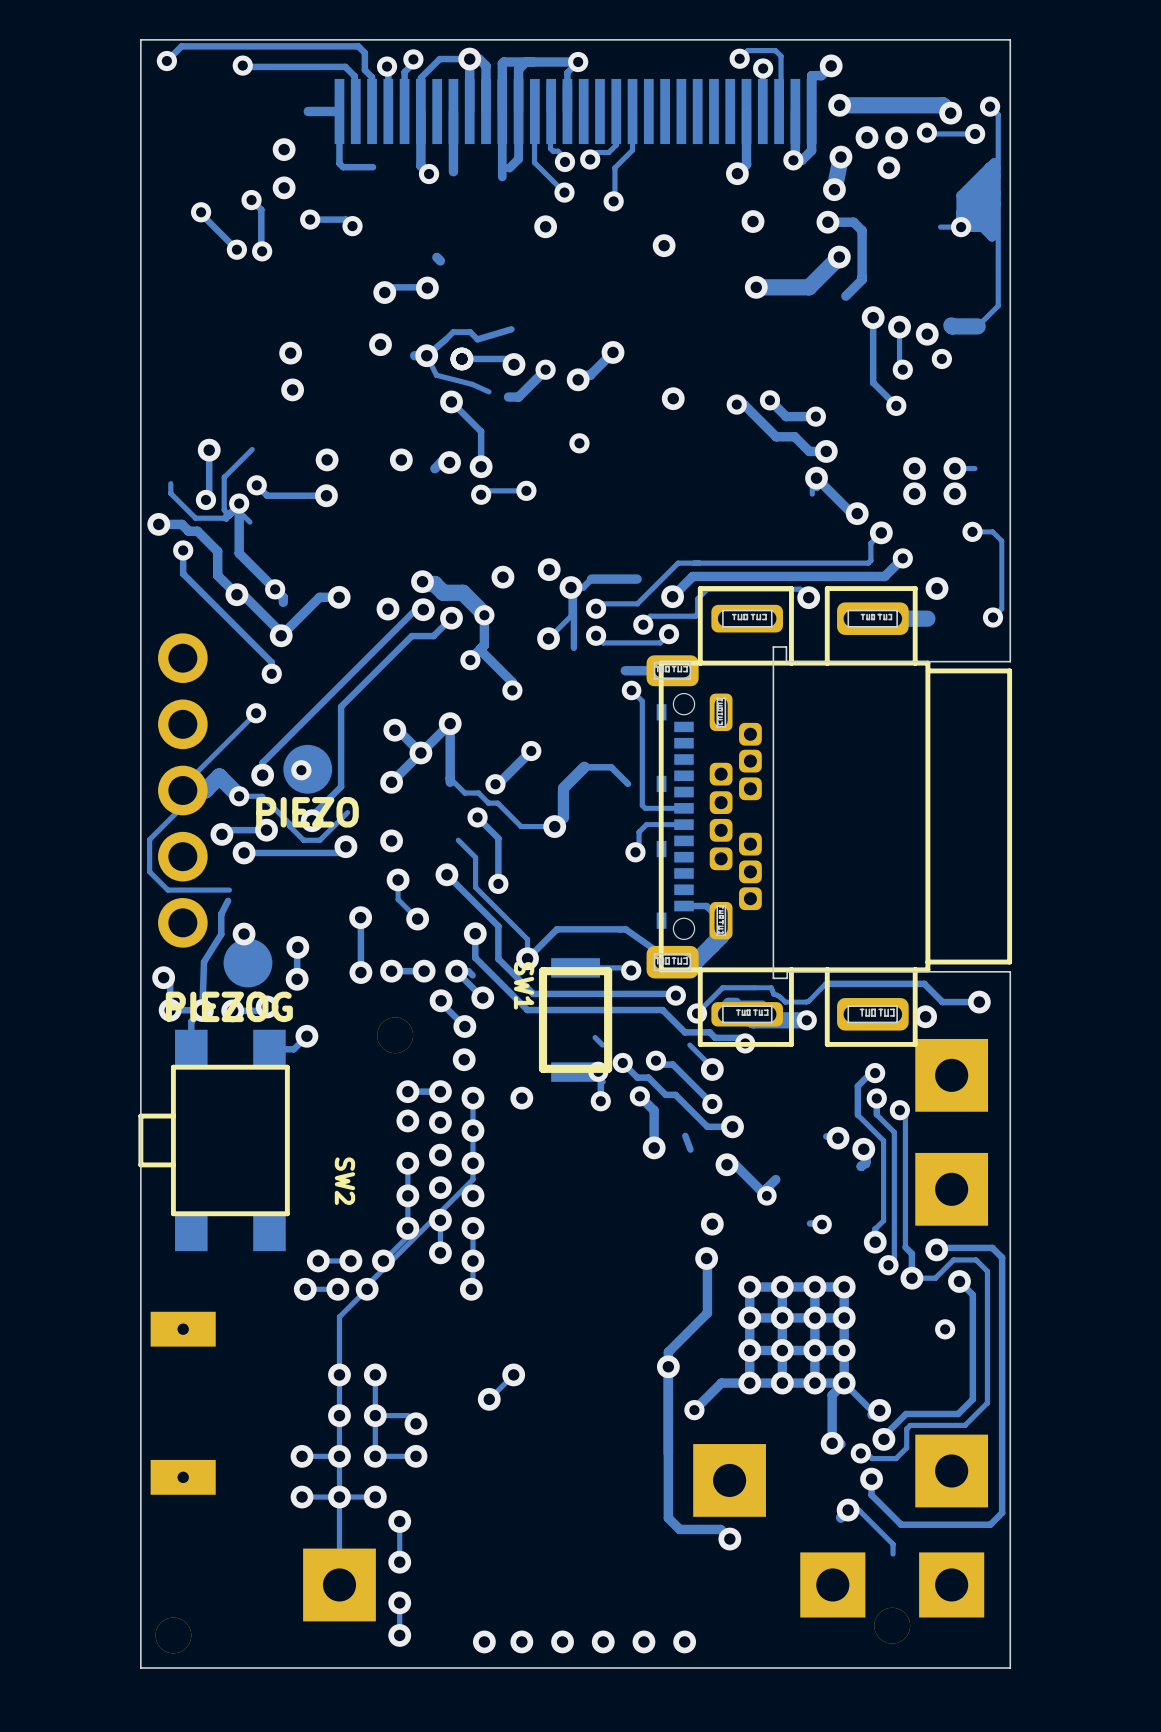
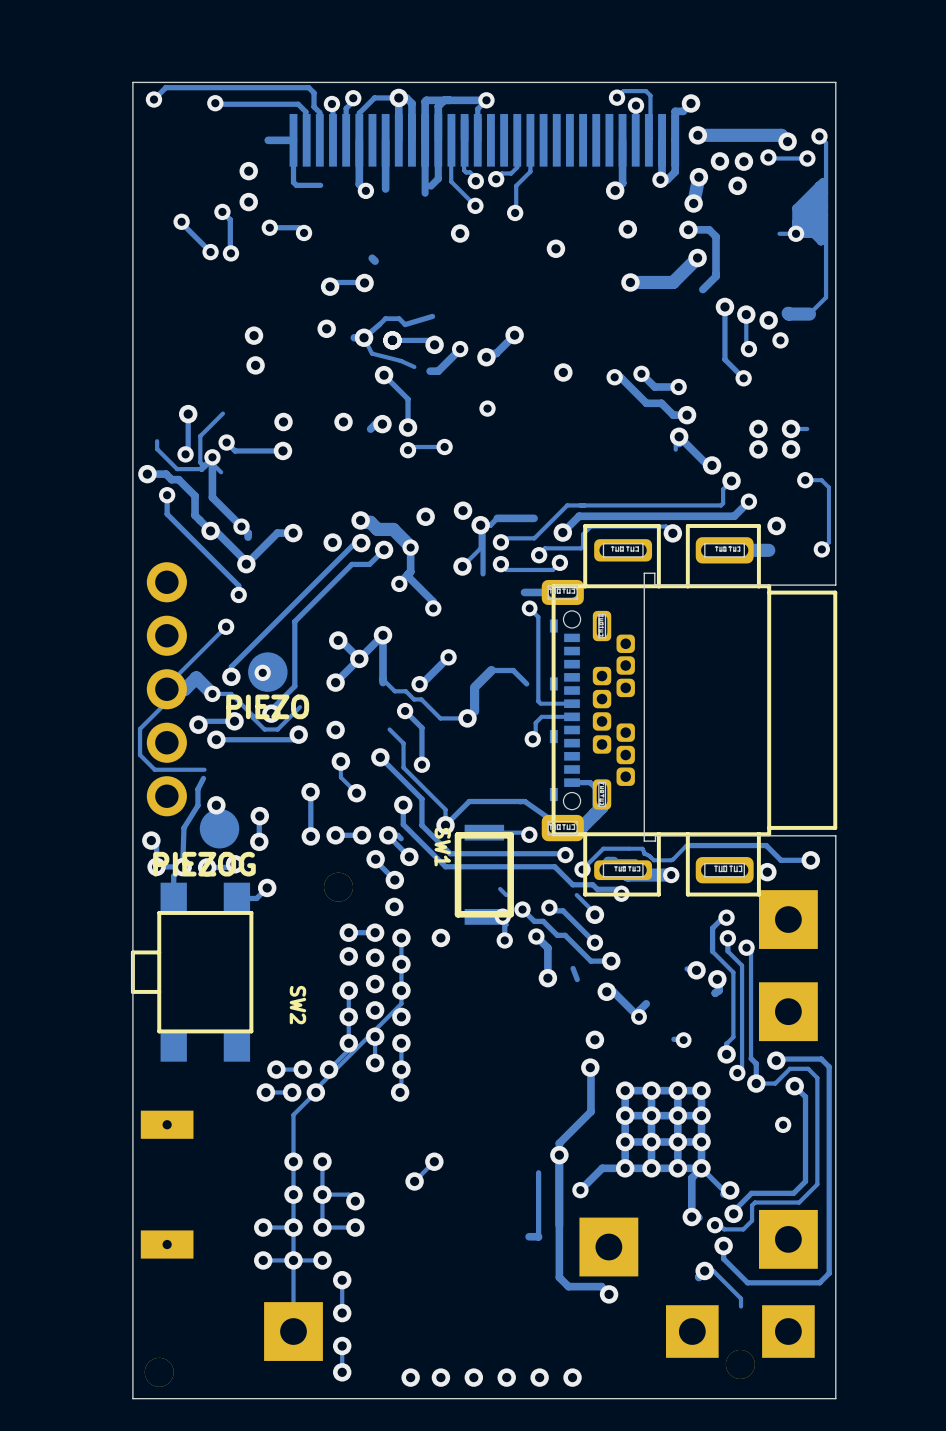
track: none -> (538, 1172) (538, 1237)
track: none -> (538, 1236) (529, 1236)

